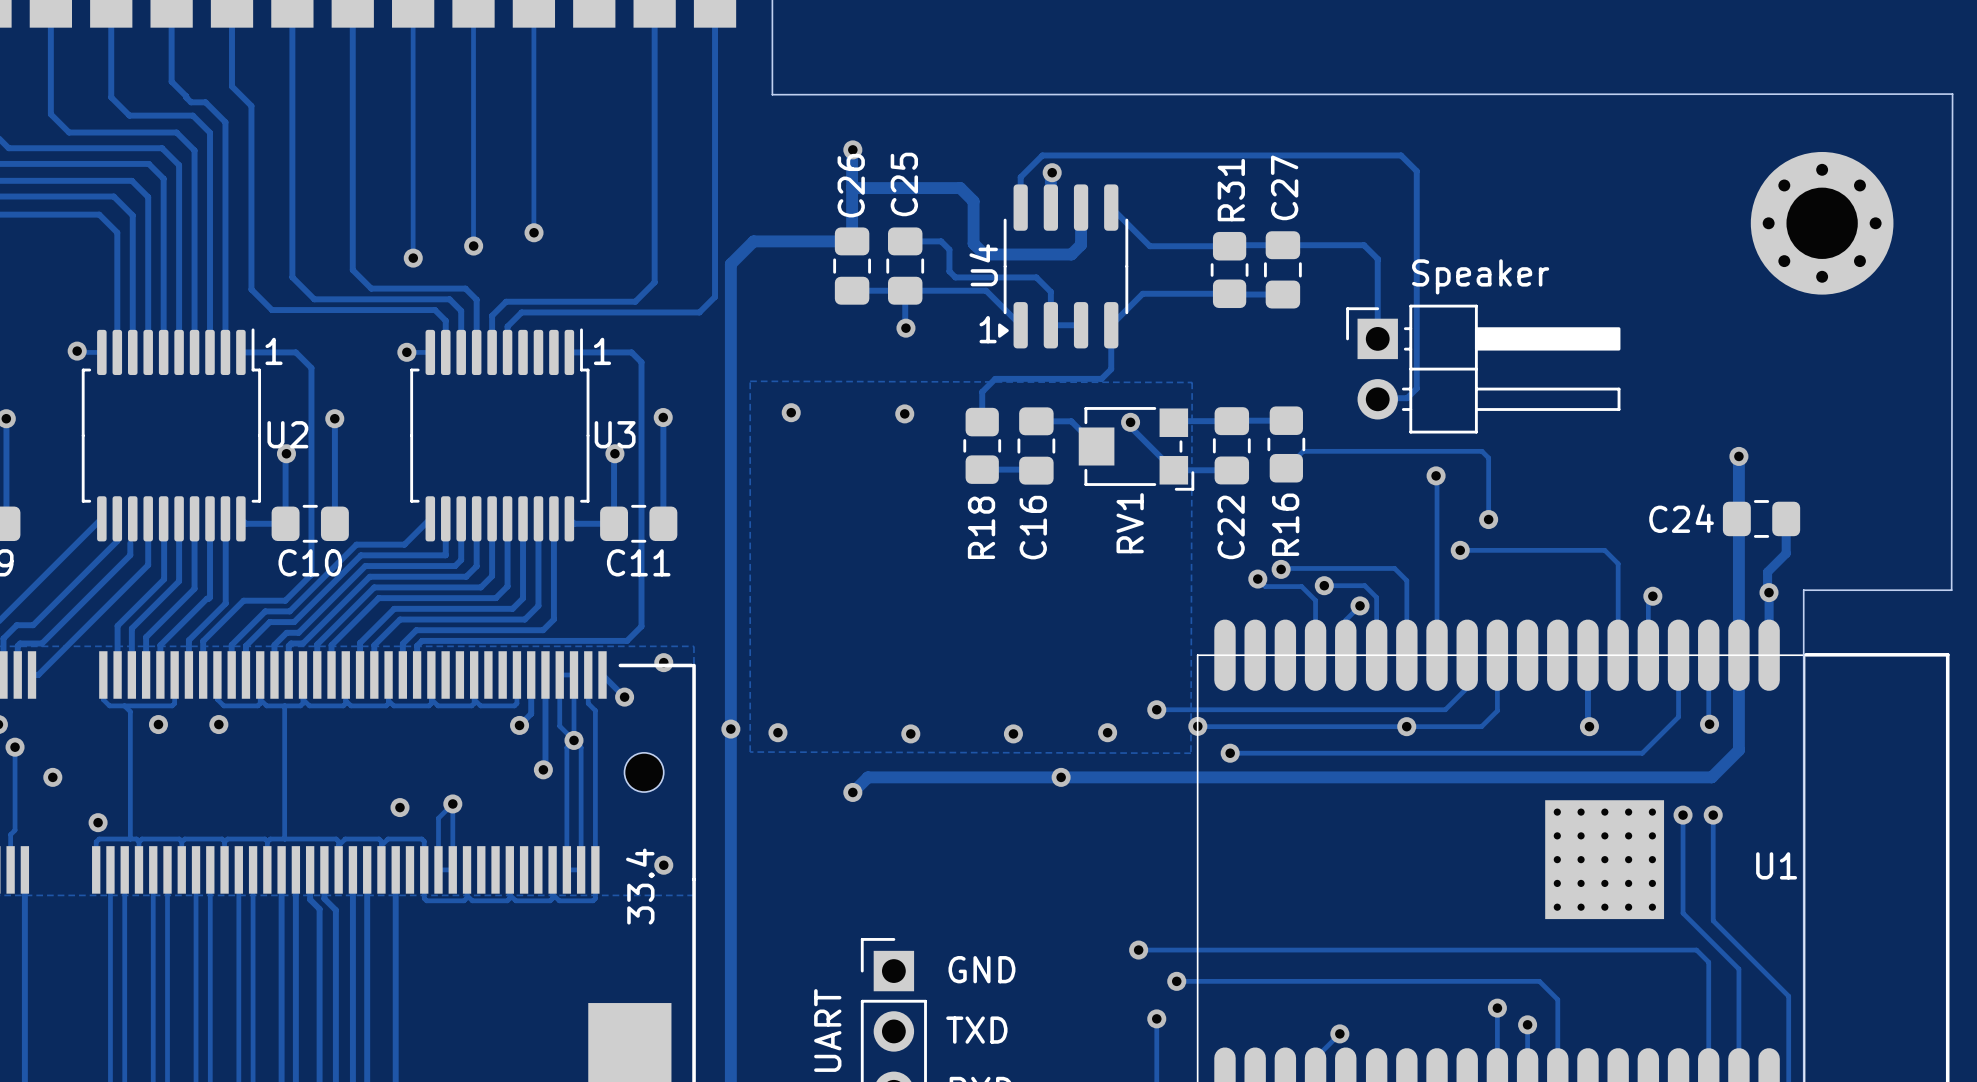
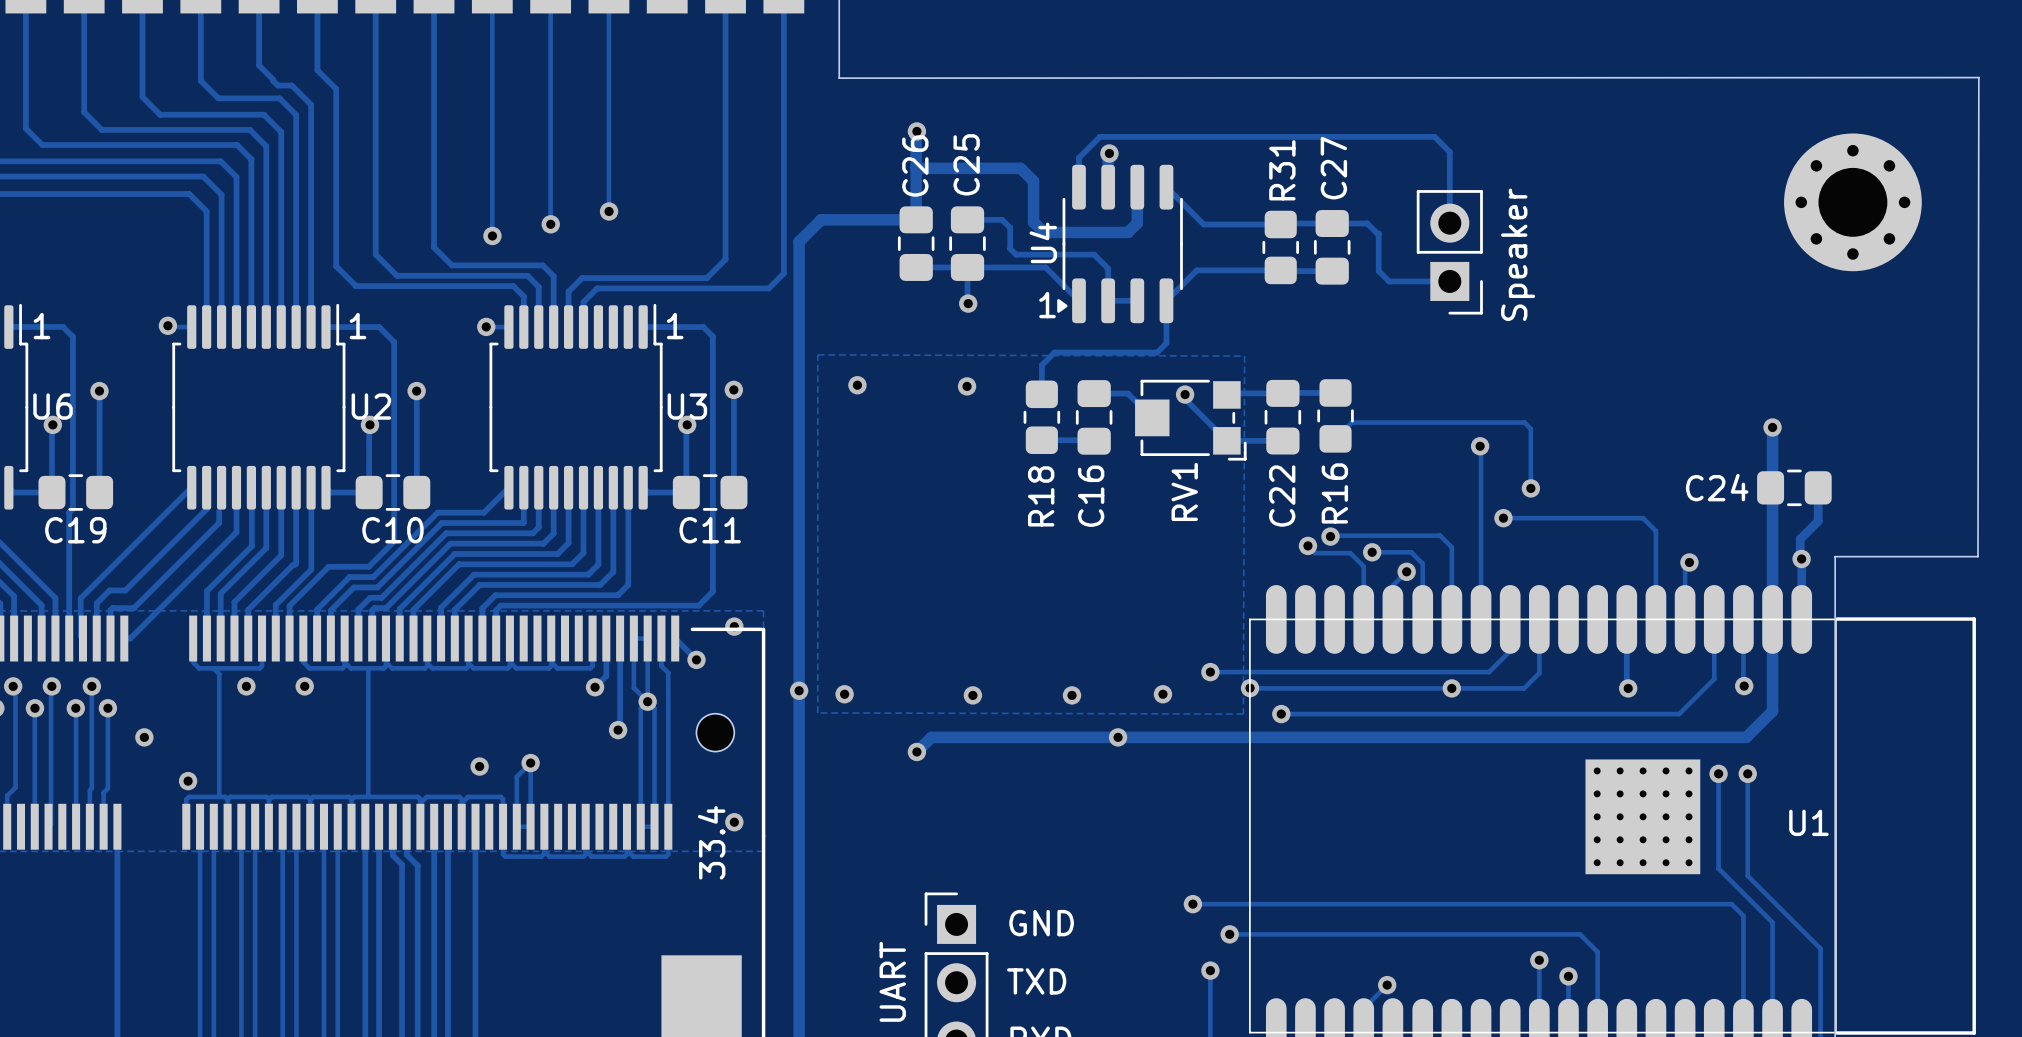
track: (1388, 155) (1401, 155) (1416, 171) (1416, 388) (1407, 398) (1377, 399) -> (1434, 136) (1449, 152) (1449, 223)
track: (1319, 245) (1364, 245) (1378, 259) (1377, 338) -> (1367, 223) (1378, 233) (1378, 270) (1389, 281) (1449, 281)
part: none -> (1449, 252)
text rotation: 0° (1480, 276) -> 90° counterclockwise (1518, 254)
part: (1483, 369) -> none

